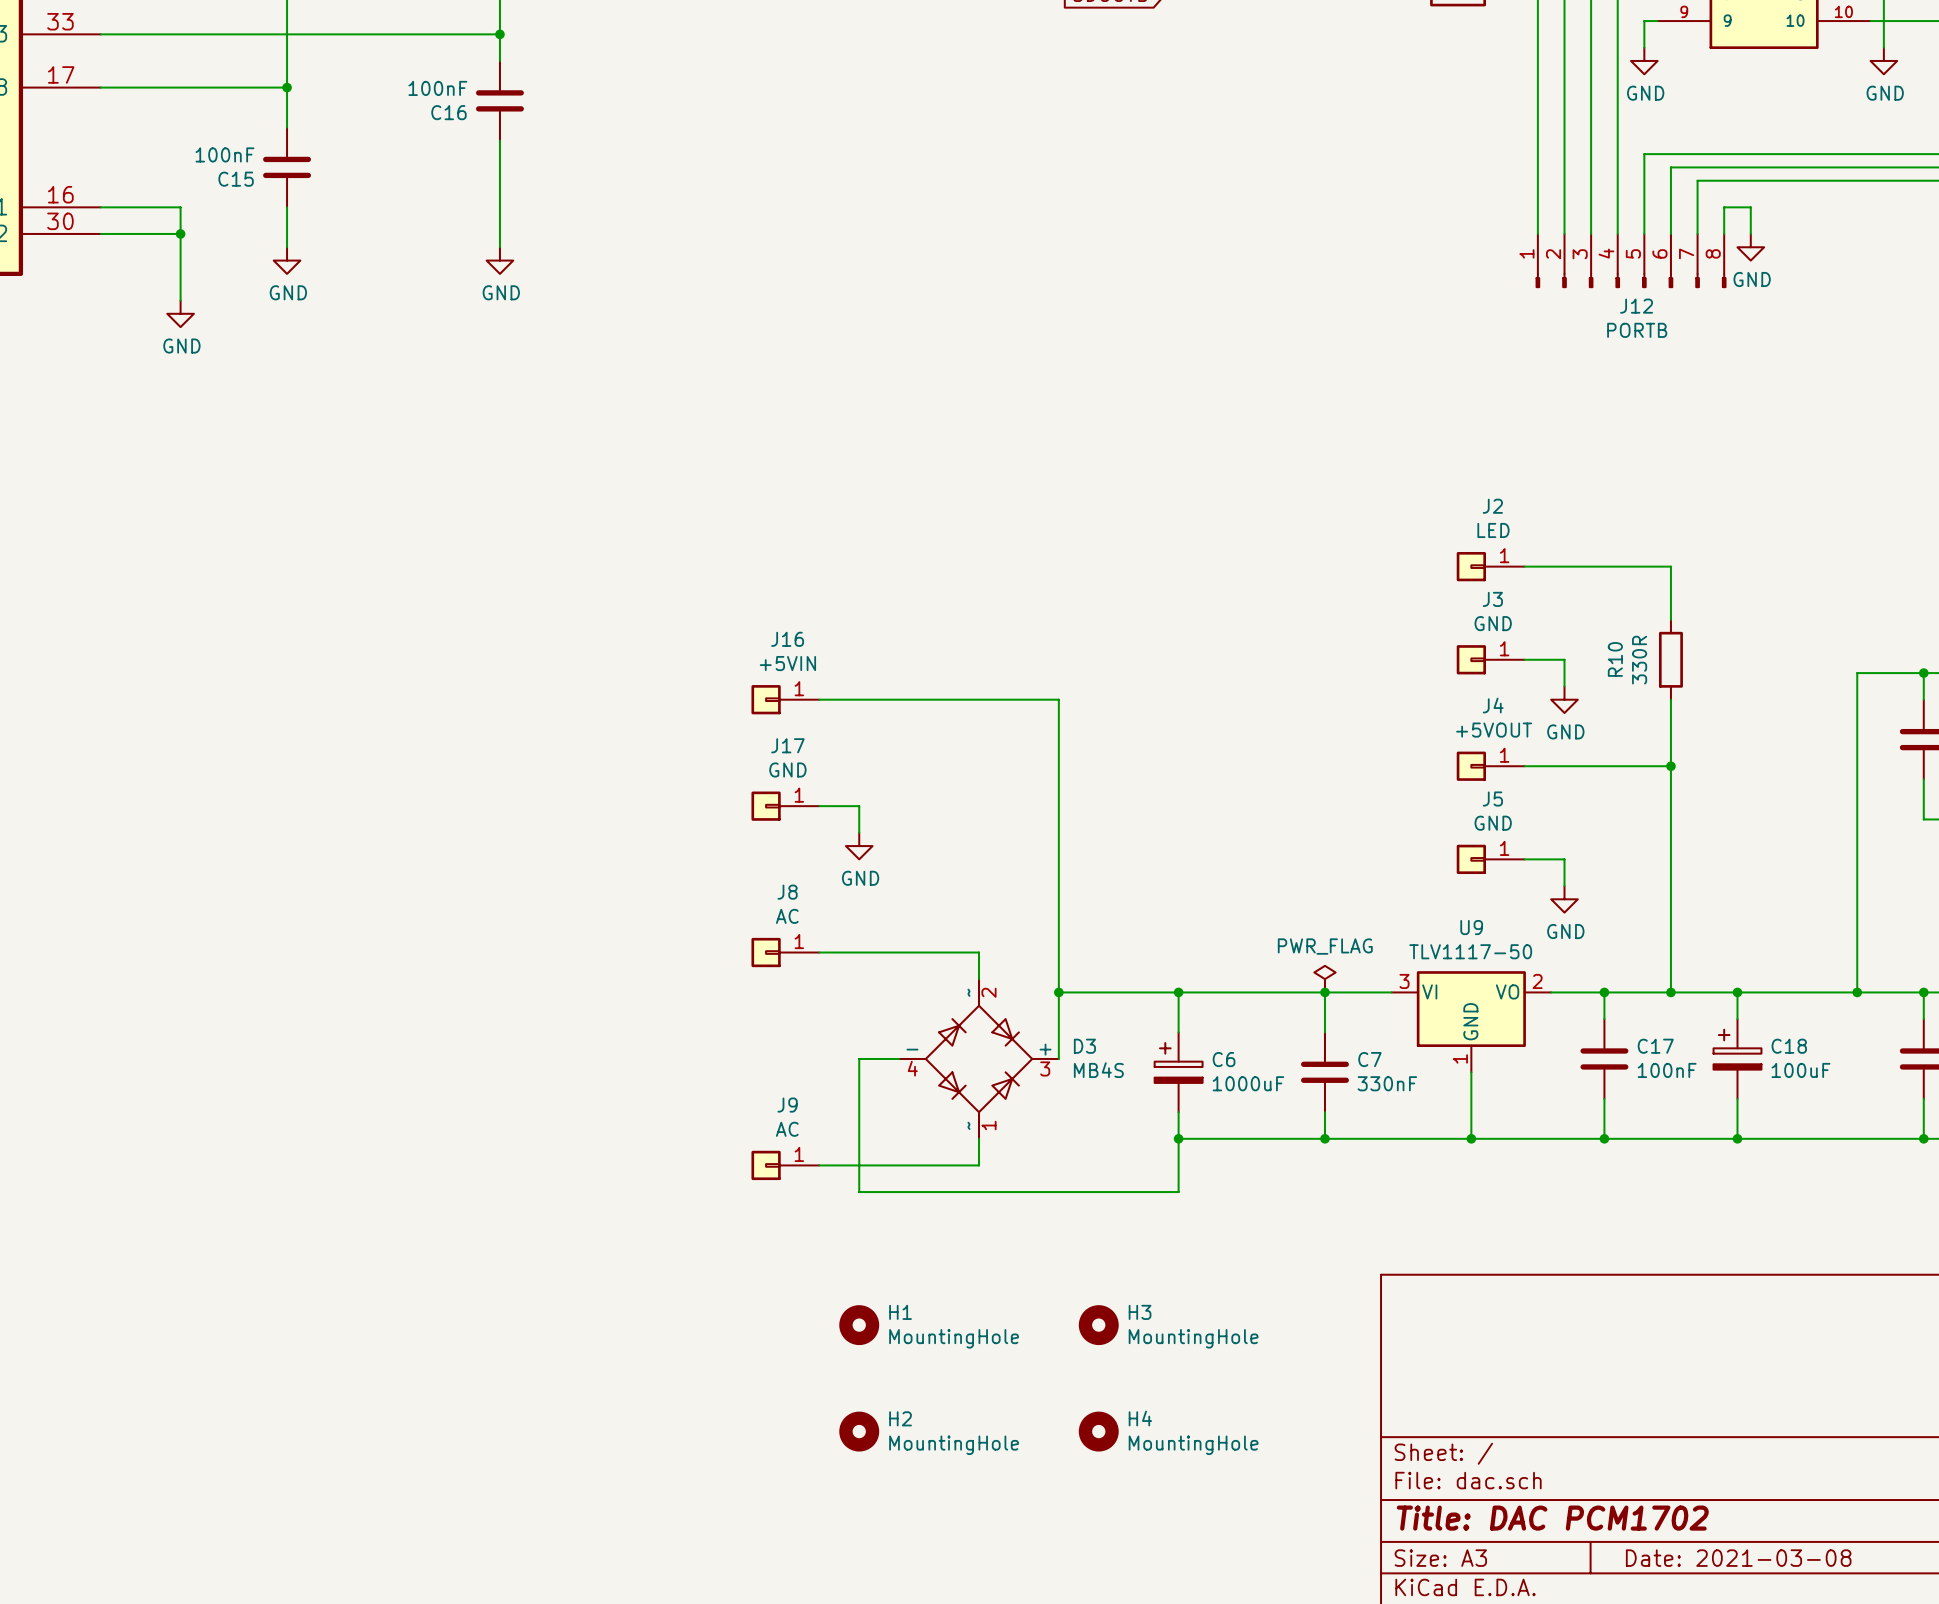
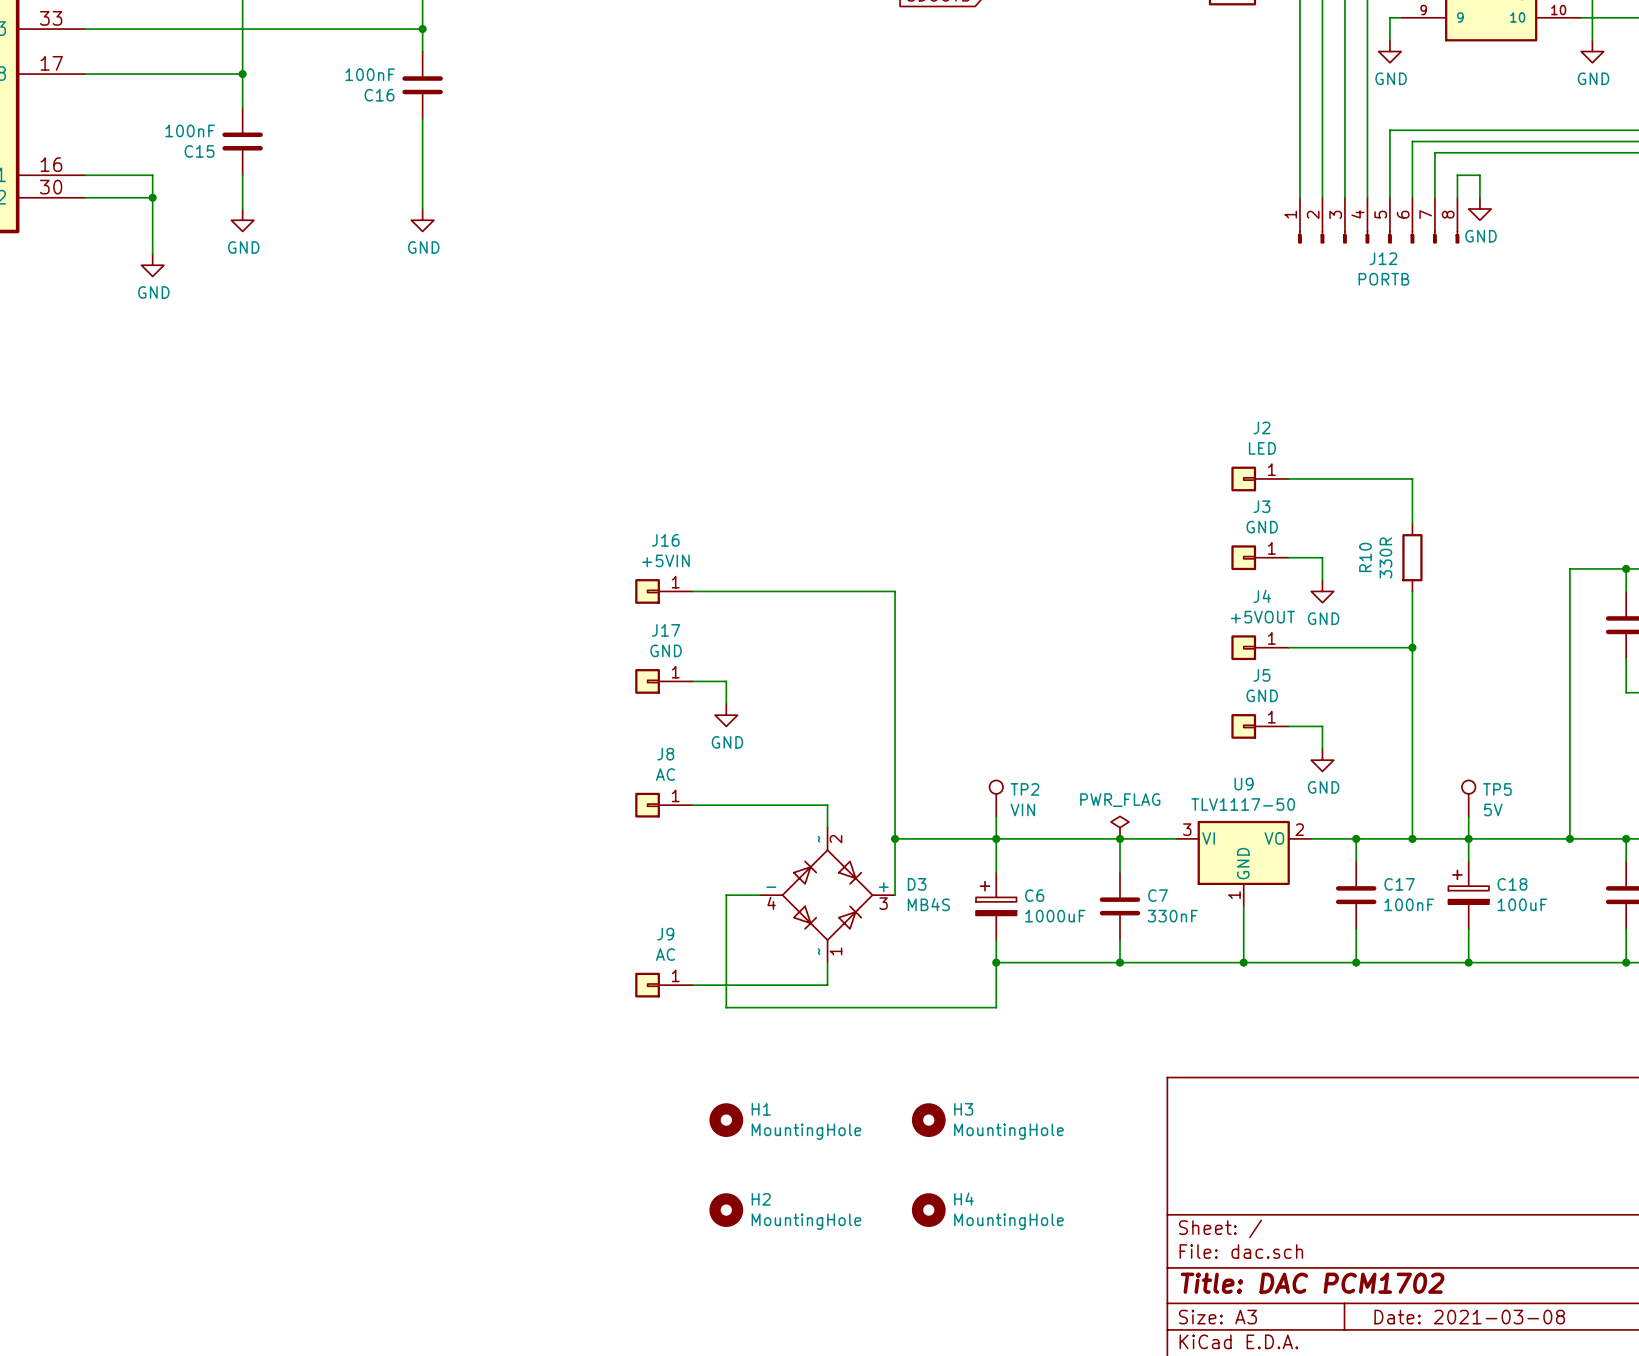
TP2: none -> VIN (996, 798)
TP5: none -> 5V (1468, 798)
wire: none -> (996, 816) (996, 838)
wire: none -> (1468, 816) (1468, 838)

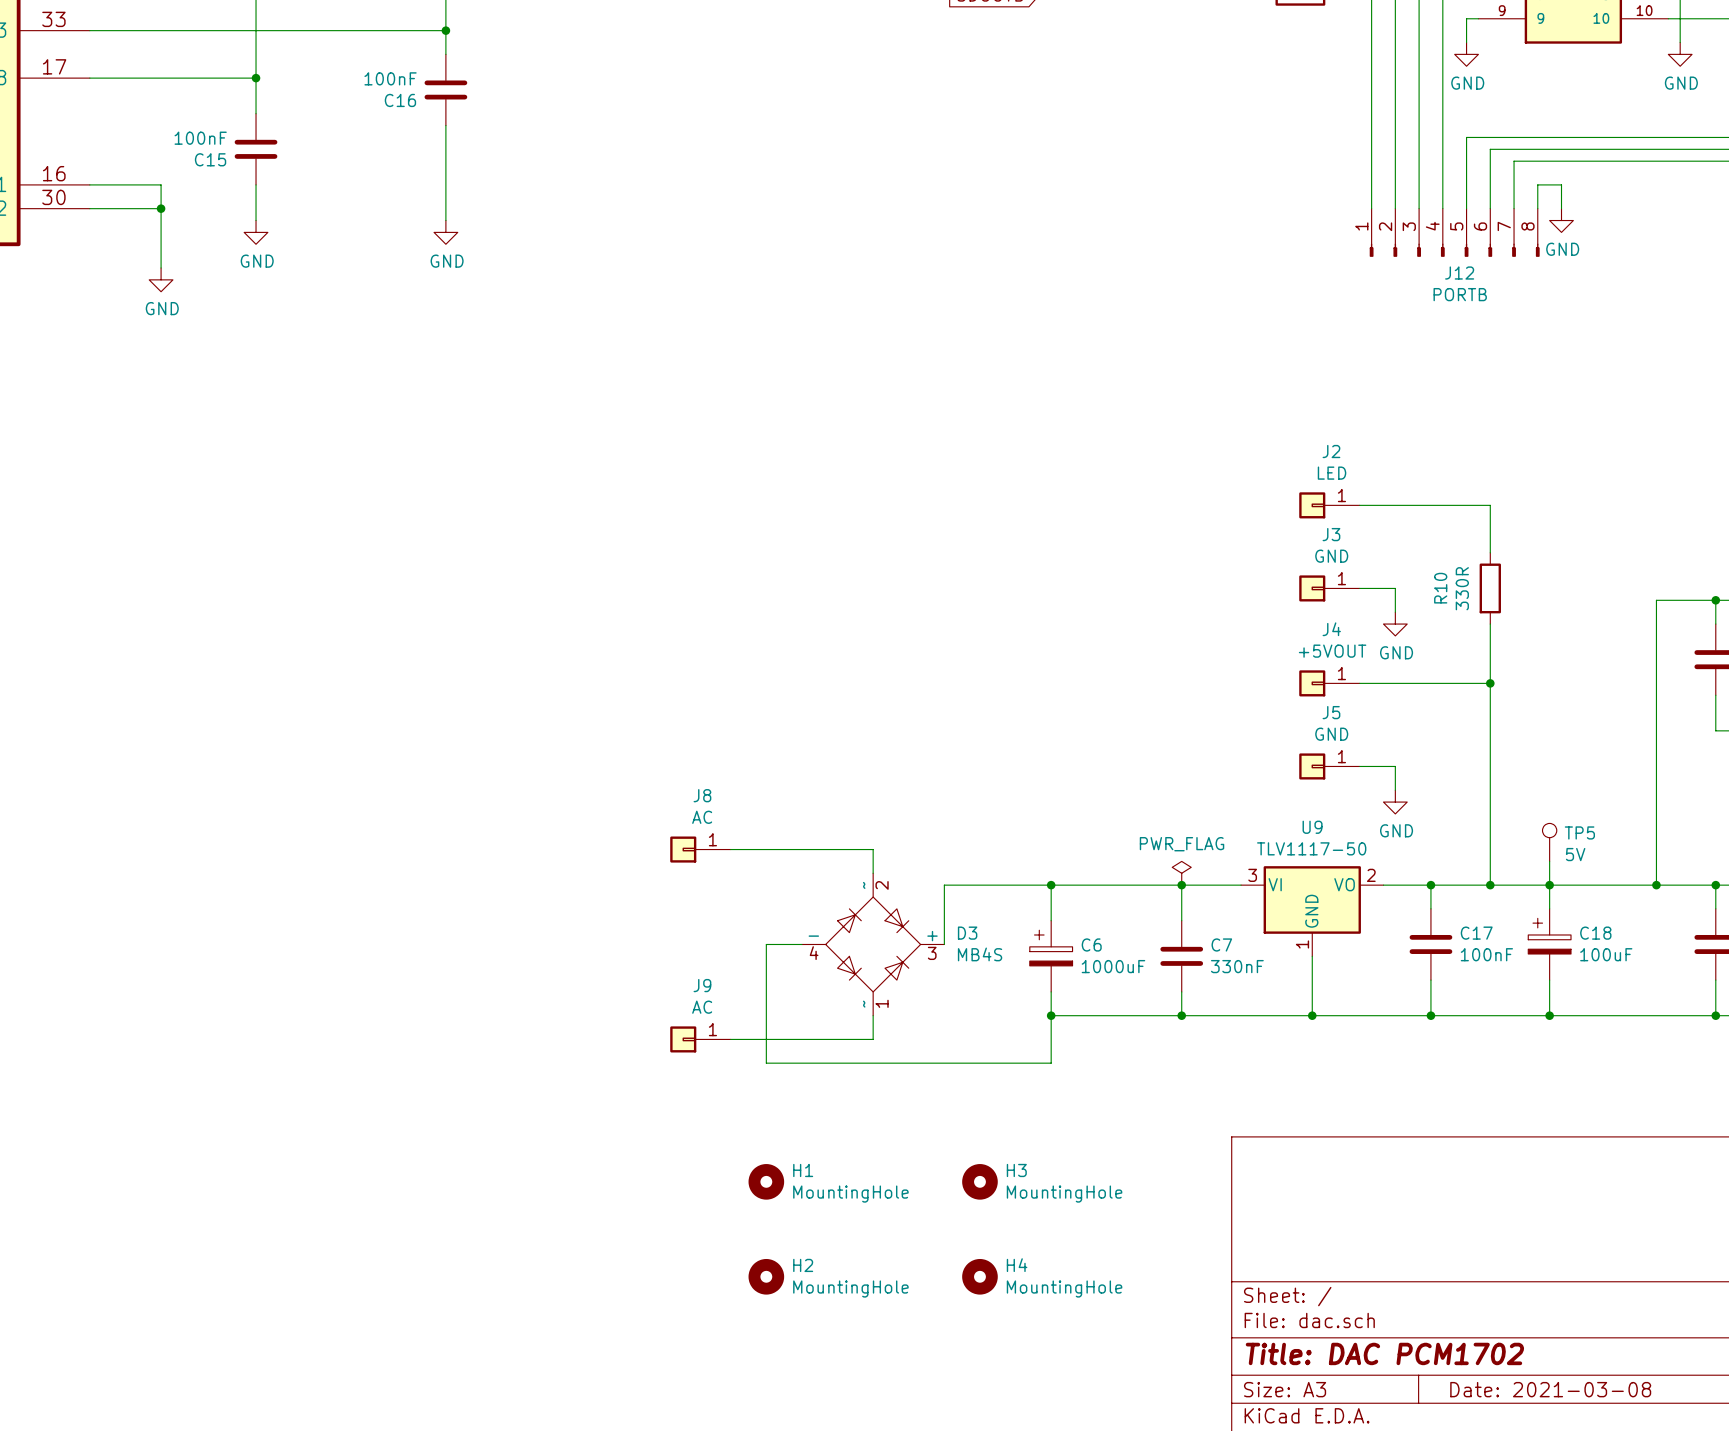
J16: +5VIN (663, 591) -> none
wire: (692, 591) (895, 591) (895, 838) -> none
J17: GND (663, 681) -> none
wire: (692, 681) (726, 681) (726, 703) -> none
power symbol: GND (726, 715) -> none
TP2: VIN (996, 798) -> none
wire: (996, 816) (996, 838) -> none
junction: (895, 838) -> none

